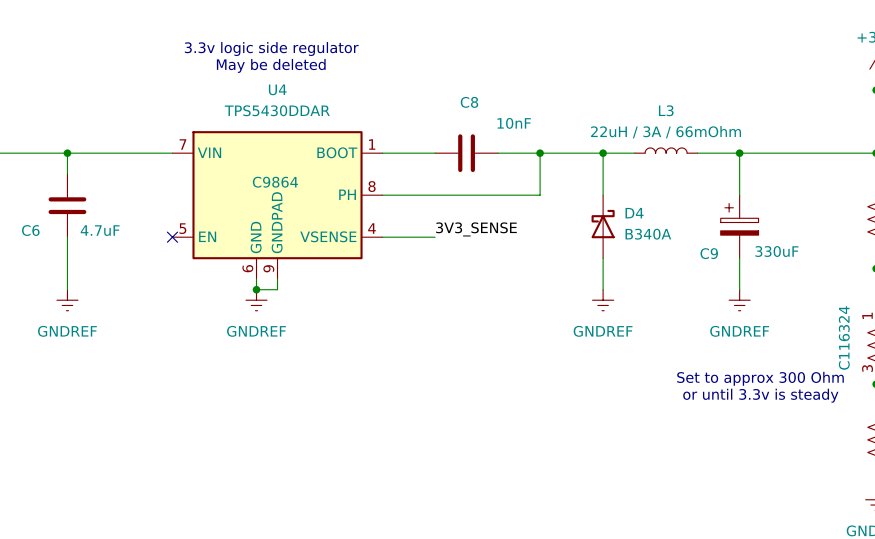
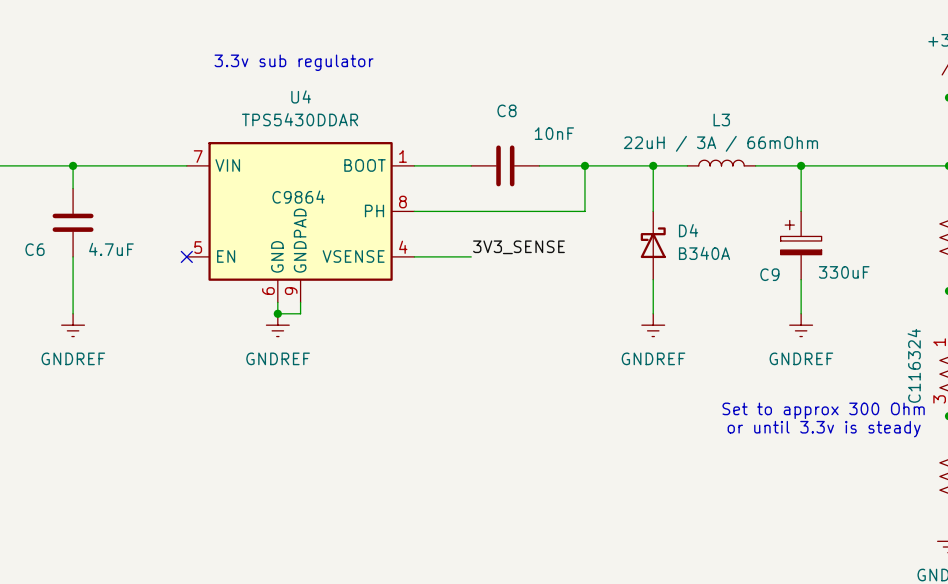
text: 3.3v logic side regulator (271, 49) -> 3.3v sub regulator (294, 62)
text: May be deleted (271, 65) -> none

